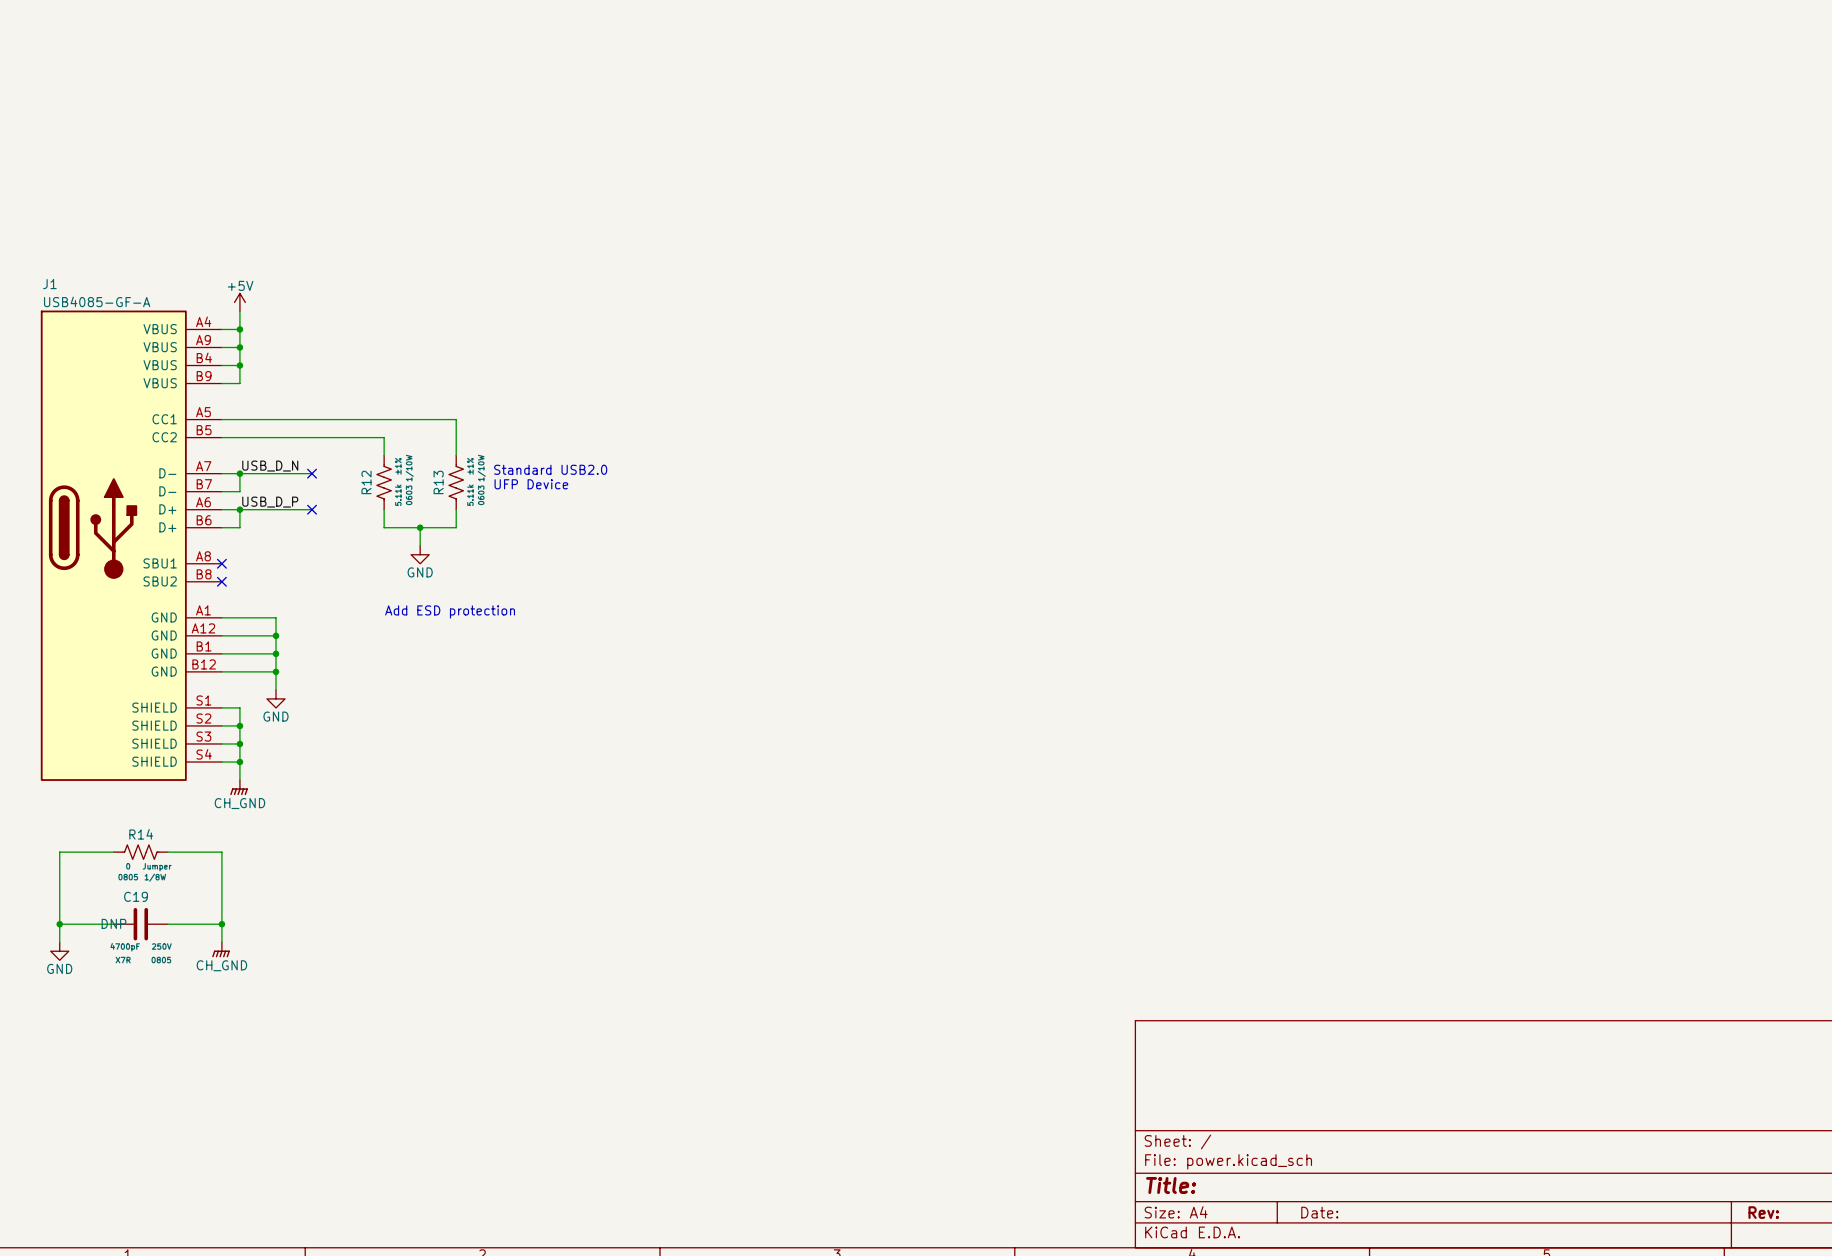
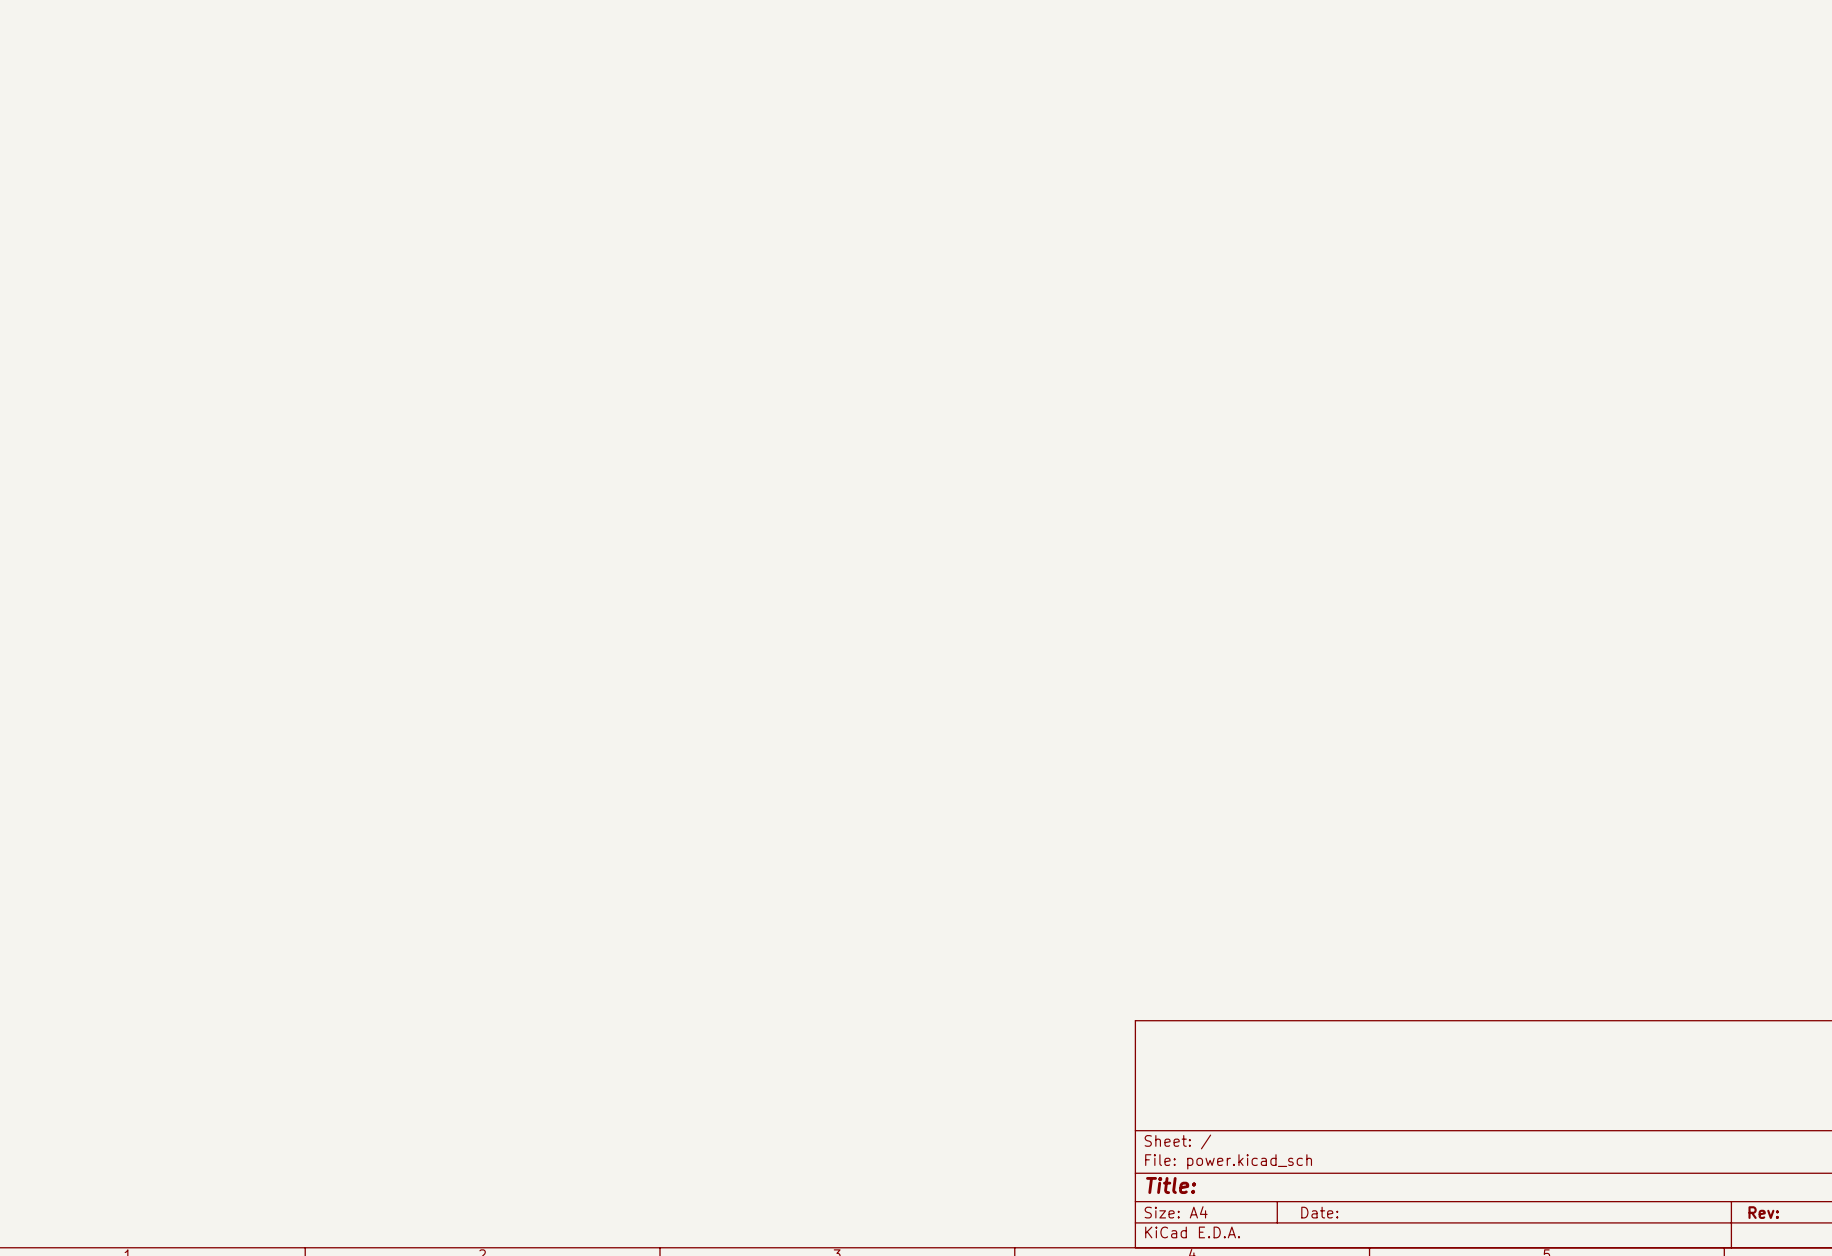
power symbol: +5V (239, 302) -> none
wire: (239, 311) (239, 383) (221, 383) -> none
wire: (221, 329) (239, 329) -> none
junction: (239, 329) -> none
wire: (221, 347) (239, 347) -> none
junction: (239, 347) -> none
wire: (221, 365) (239, 365) -> none
junction: (239, 365) -> none
wire: (221, 419) (456, 419) (456, 455) -> none
wire: (221, 437) (384, 437) (384, 455) -> none
label: USB_D_N (270, 466) -> none
text: Standard USB2.0 (550, 469) -> none
wire: (221, 473) (312, 473) -> none
wire: (239, 473) (239, 491) (221, 491) -> none
junction: (239, 473) -> none
no-connect mark: (312, 473) -> none
R12: (384, 482) -> none
R13: (456, 482) -> none
text: UFP Device (531, 484) -> none
label: USB_D_P (270, 502) -> none
wire: (221, 509) (312, 509) -> none
wire: (239, 509) (239, 527) (221, 527) -> none
junction: (239, 509) -> none
no-connect mark: (312, 509) -> none
wire: (384, 509) (384, 527) (456, 527) (456, 509) -> none
wire: (420, 527) (420, 545) -> none
junction: (420, 527) -> none
J1: (131, 545) -> none
power symbol: GND (420, 554) -> none
no-connect mark: (221, 563) -> none
no-connect mark: (221, 581) -> none
text: Add ESD protection (450, 611) -> none
wire: (221, 617) (275, 617) (275, 689) -> none
wire: (221, 635) (275, 635) -> none
junction: (275, 635) -> none
wire: (221, 653) (275, 653) -> none
junction: (275, 653) -> none
wire: (221, 671) (275, 671) -> none
junction: (275, 671) -> none
power symbol: GND (275, 698) -> none
wire: (221, 707) (239, 707) (239, 780) -> none
wire: (221, 725) (239, 725) -> none
junction: (239, 725) -> none
wire: (221, 743) (239, 743) -> none
junction: (239, 743) -> none
wire: (221, 762) (239, 762) -> none
junction: (239, 762) -> none
power symbol: CH_GND (239, 787) -> none
wire: (113, 852) (59, 852) (59, 942) -> none
R14: (140, 852) -> none
wire: (167, 852) (221, 852) (221, 942) -> none
wire: (59, 924) (113, 924) -> none
junction: (59, 924) -> none
C19: (140, 924) -> none
wire: (167, 924) (221, 924) -> none
junction: (221, 924) -> none
power symbol: CH_GND (221, 949) -> none
power symbol: GND (59, 951) -> none

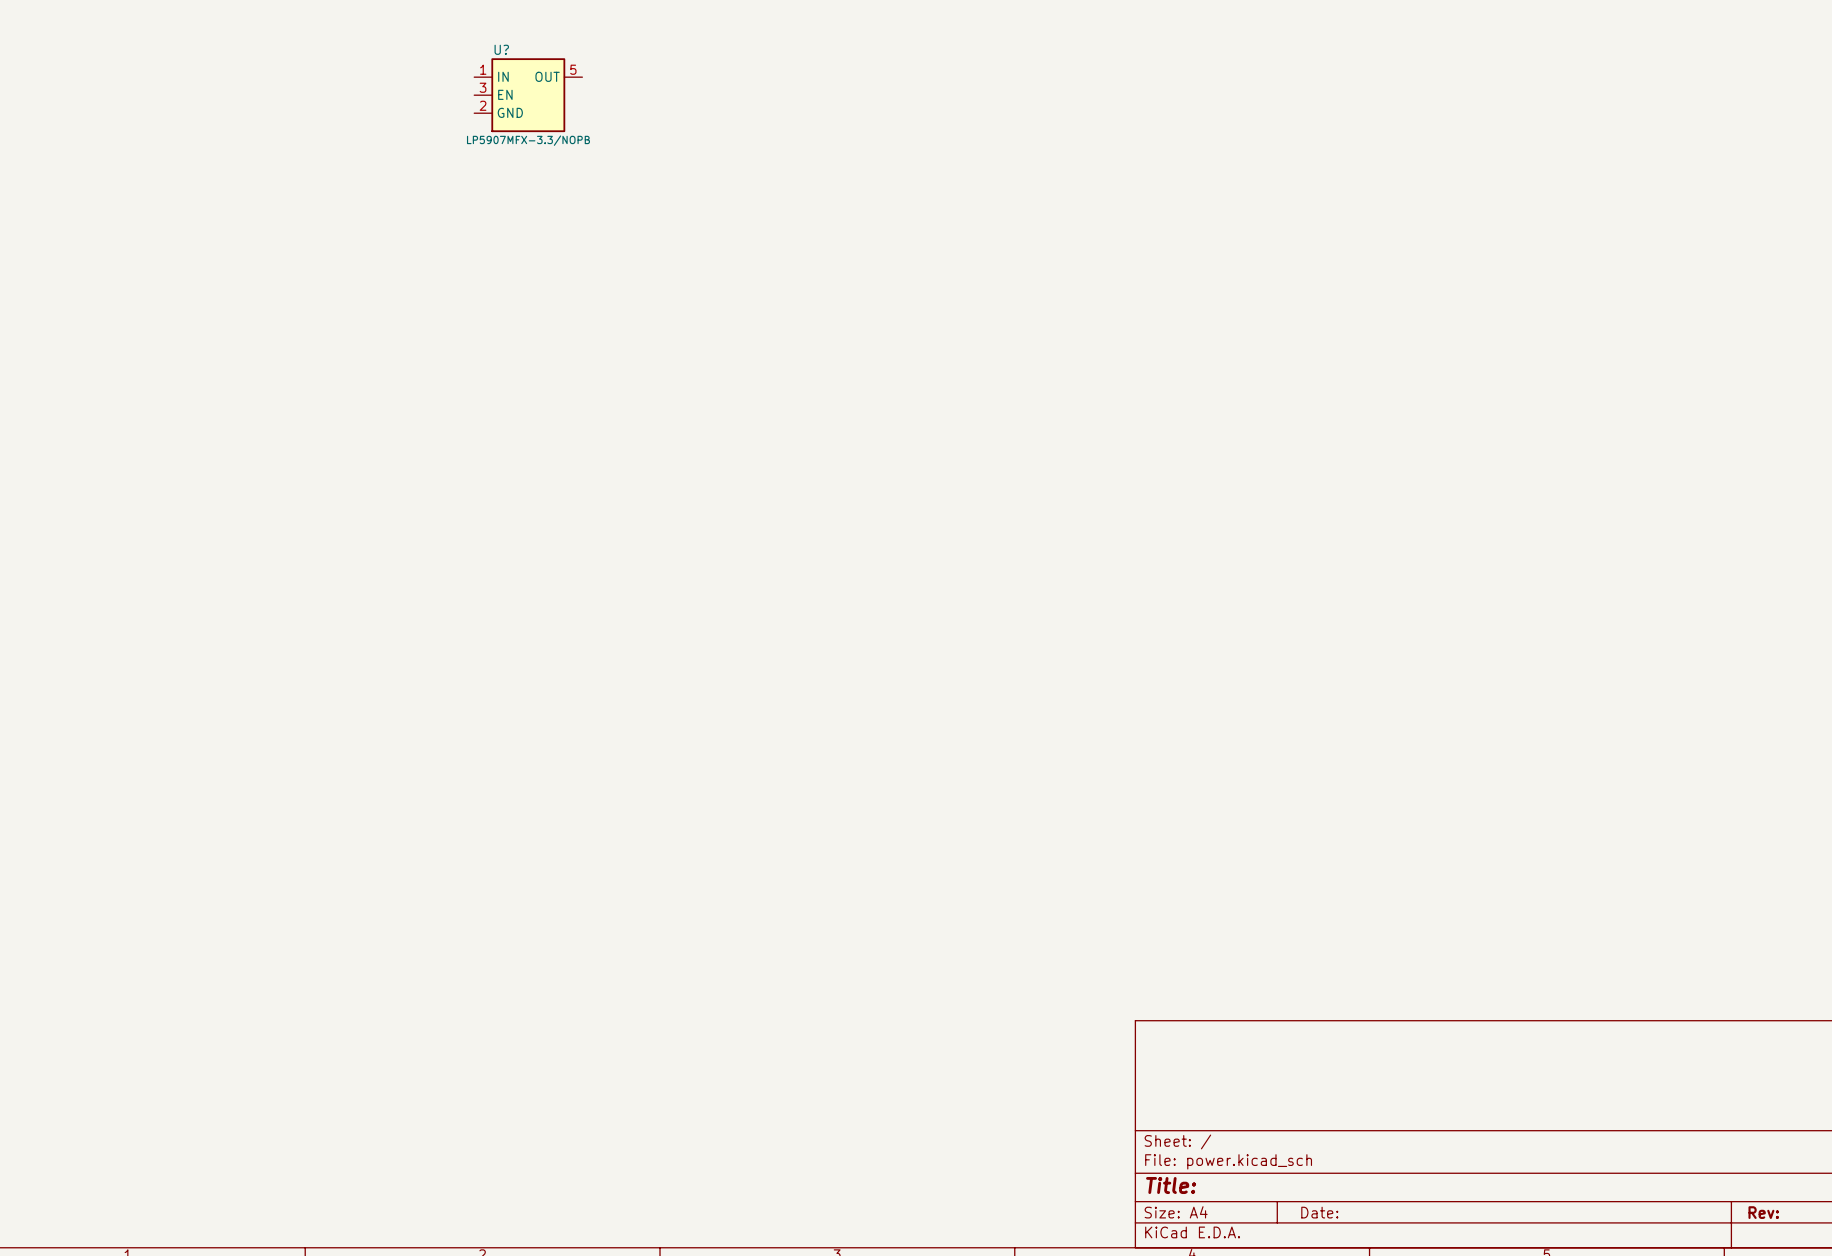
U?: none -> (528, 95)

